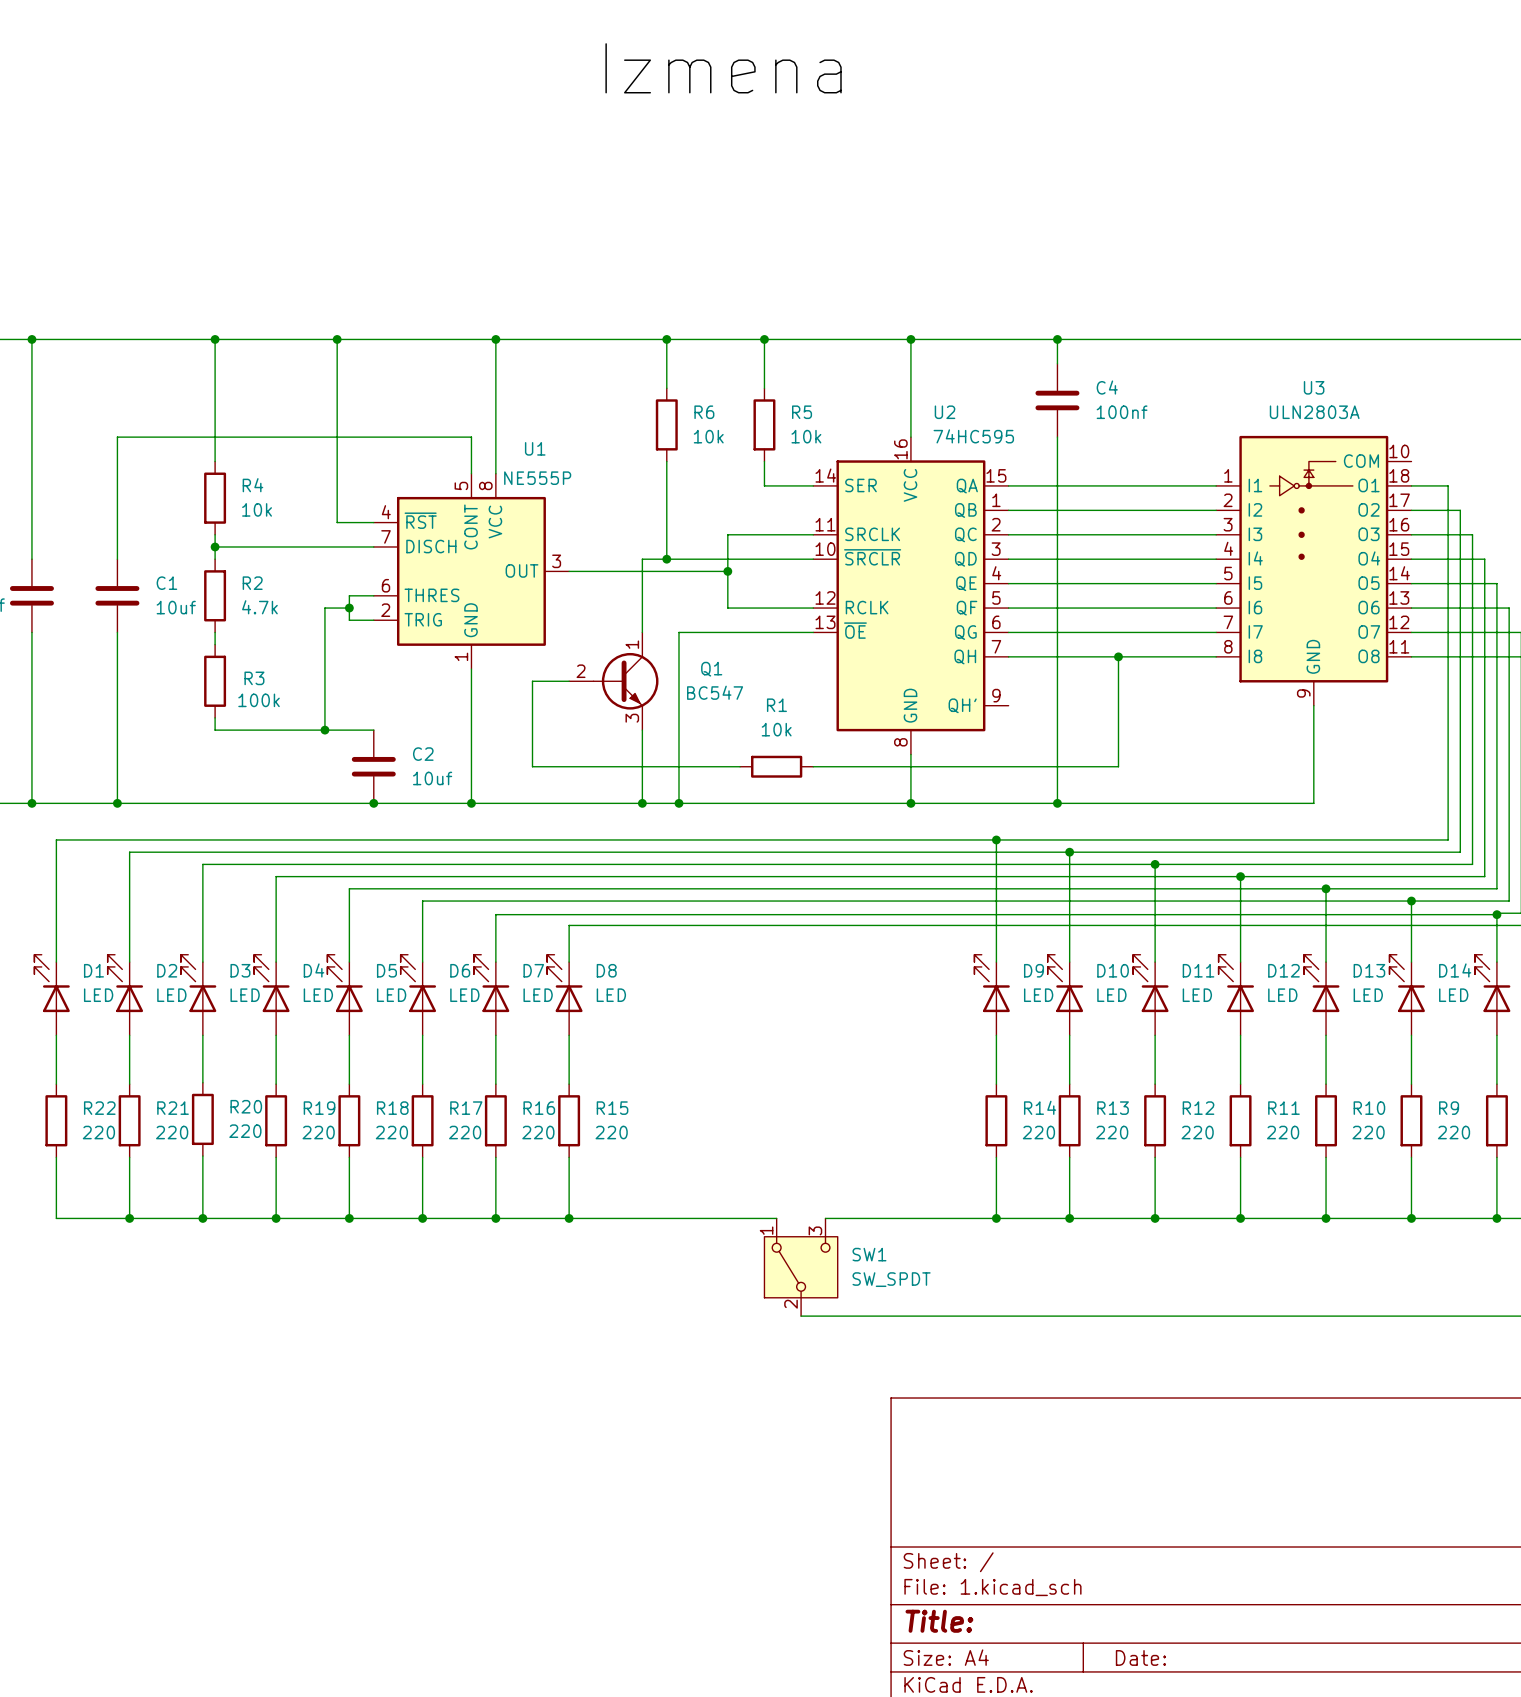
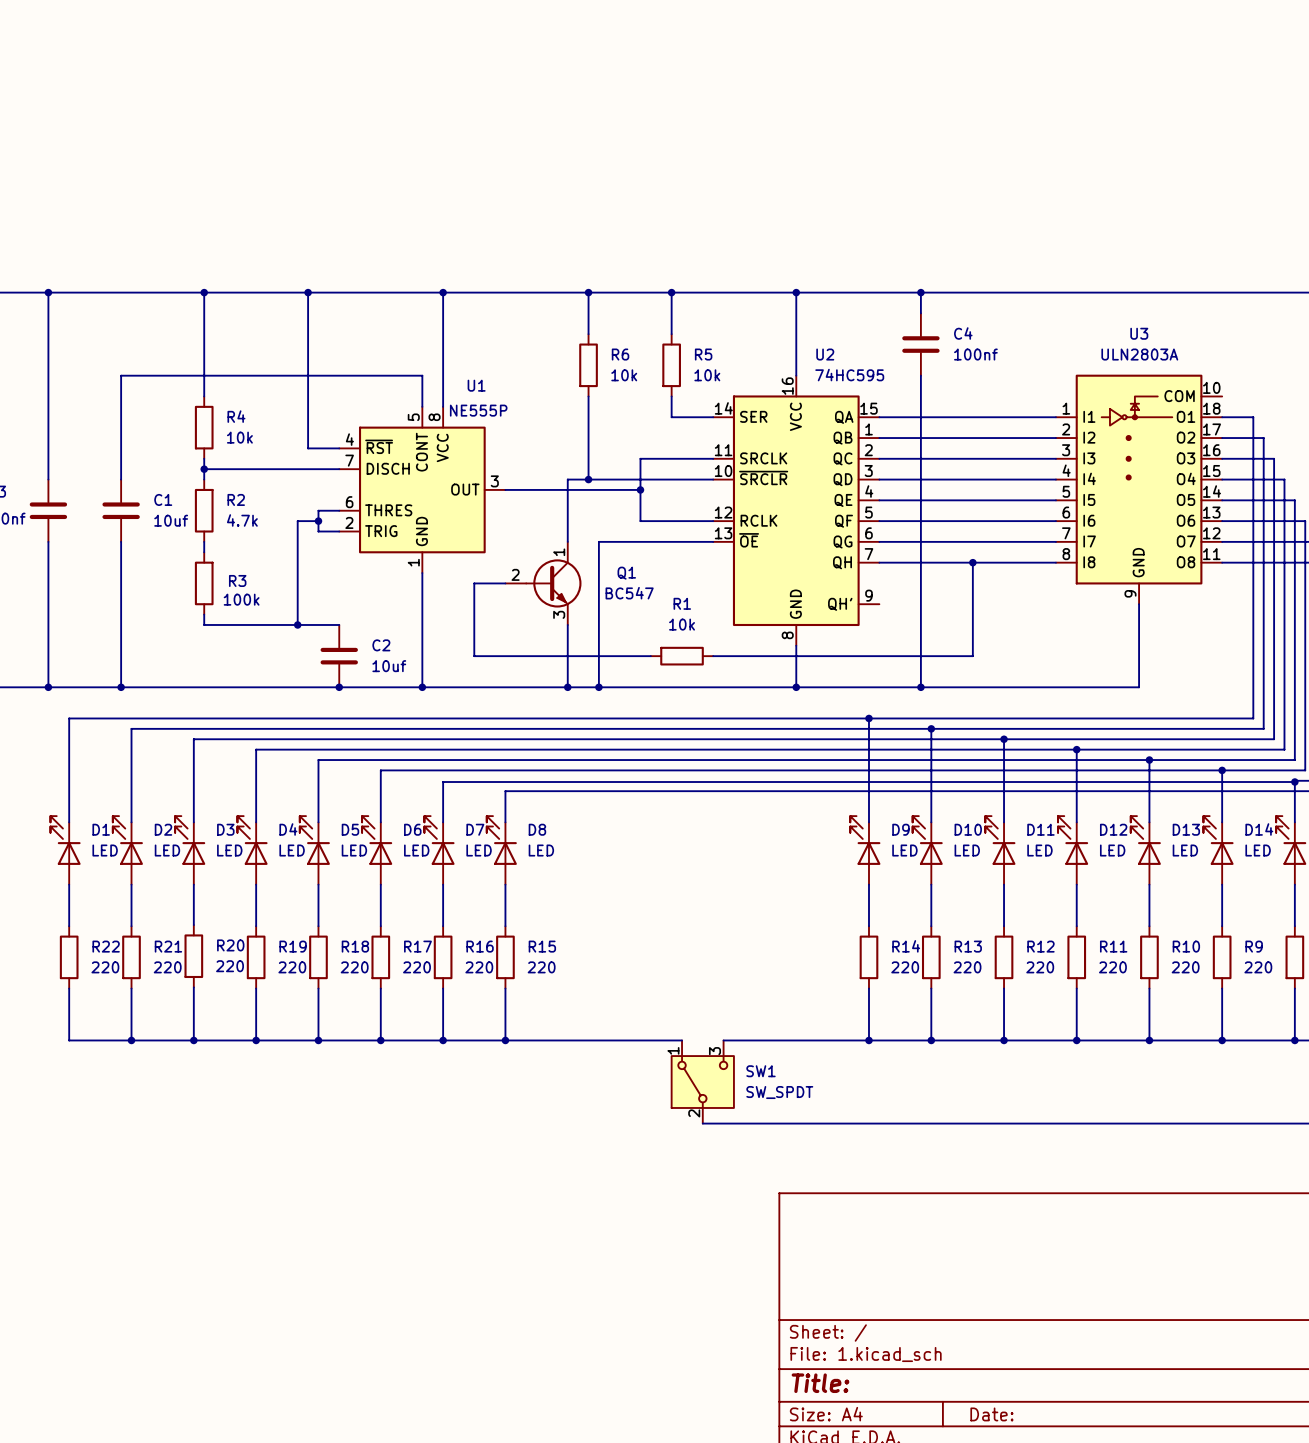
label: Izmena (723, 68) -> none

